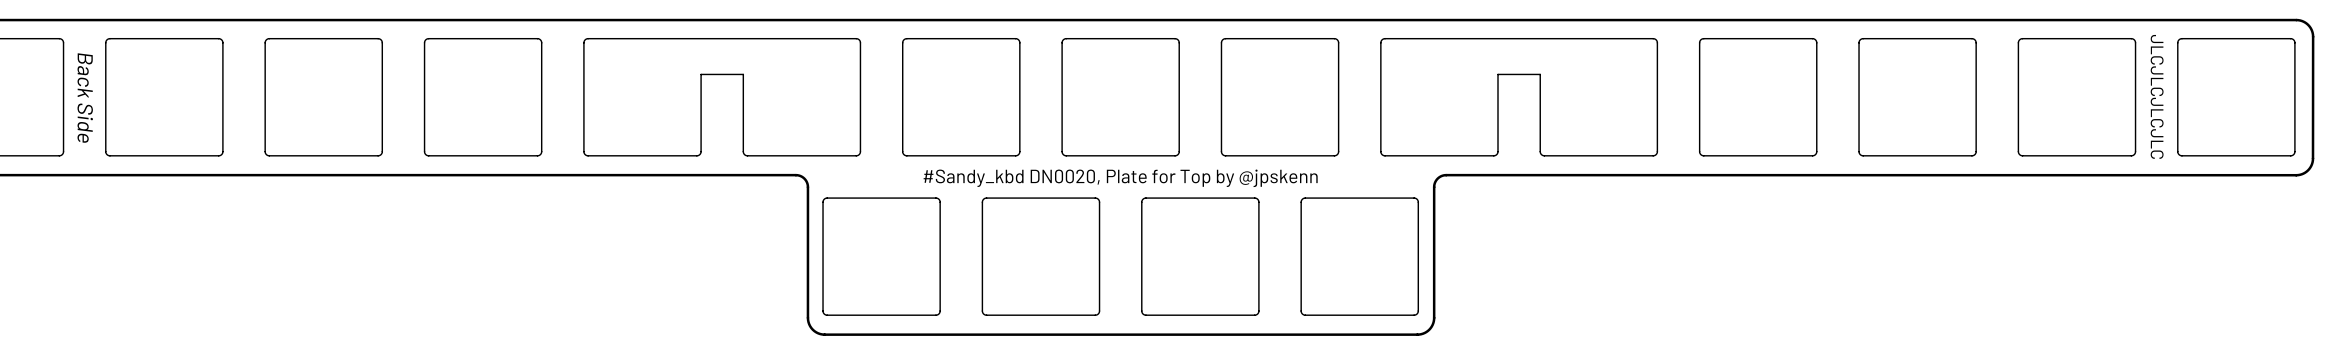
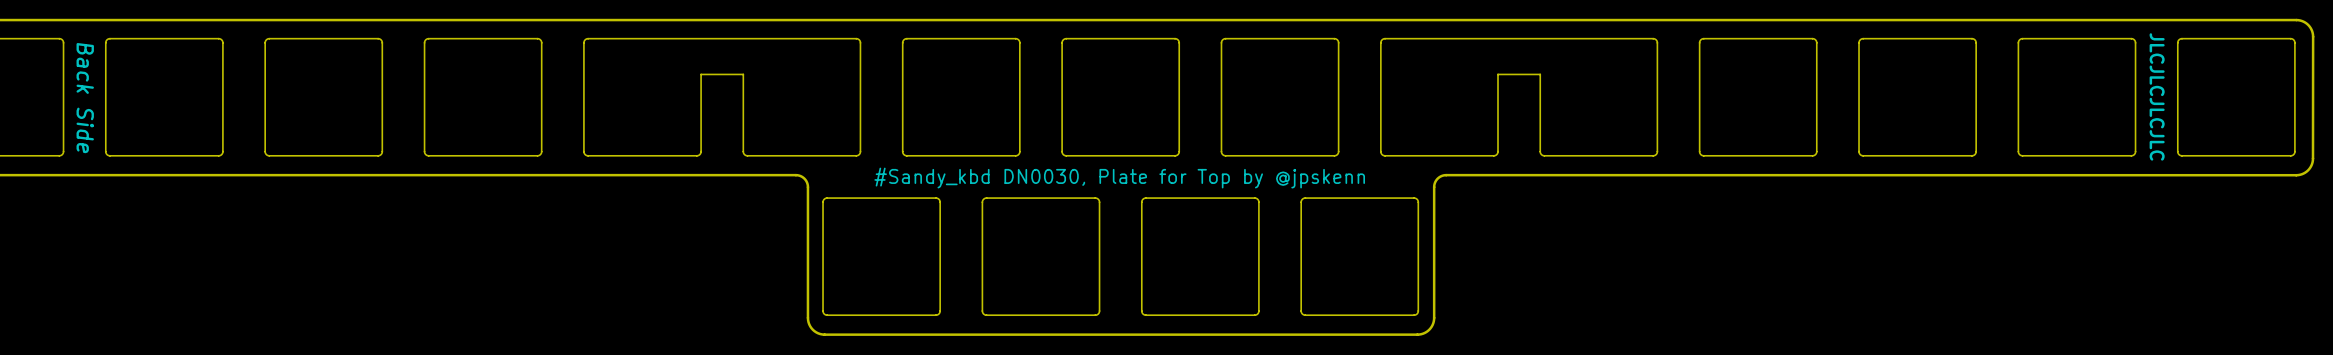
text: #Sandy_kbd DN0020, Plate for Top by @jpskenn (1120, 178) -> #Sandy_kbd DN0030, Plate for Top by @jpskenn (1119, 178)

